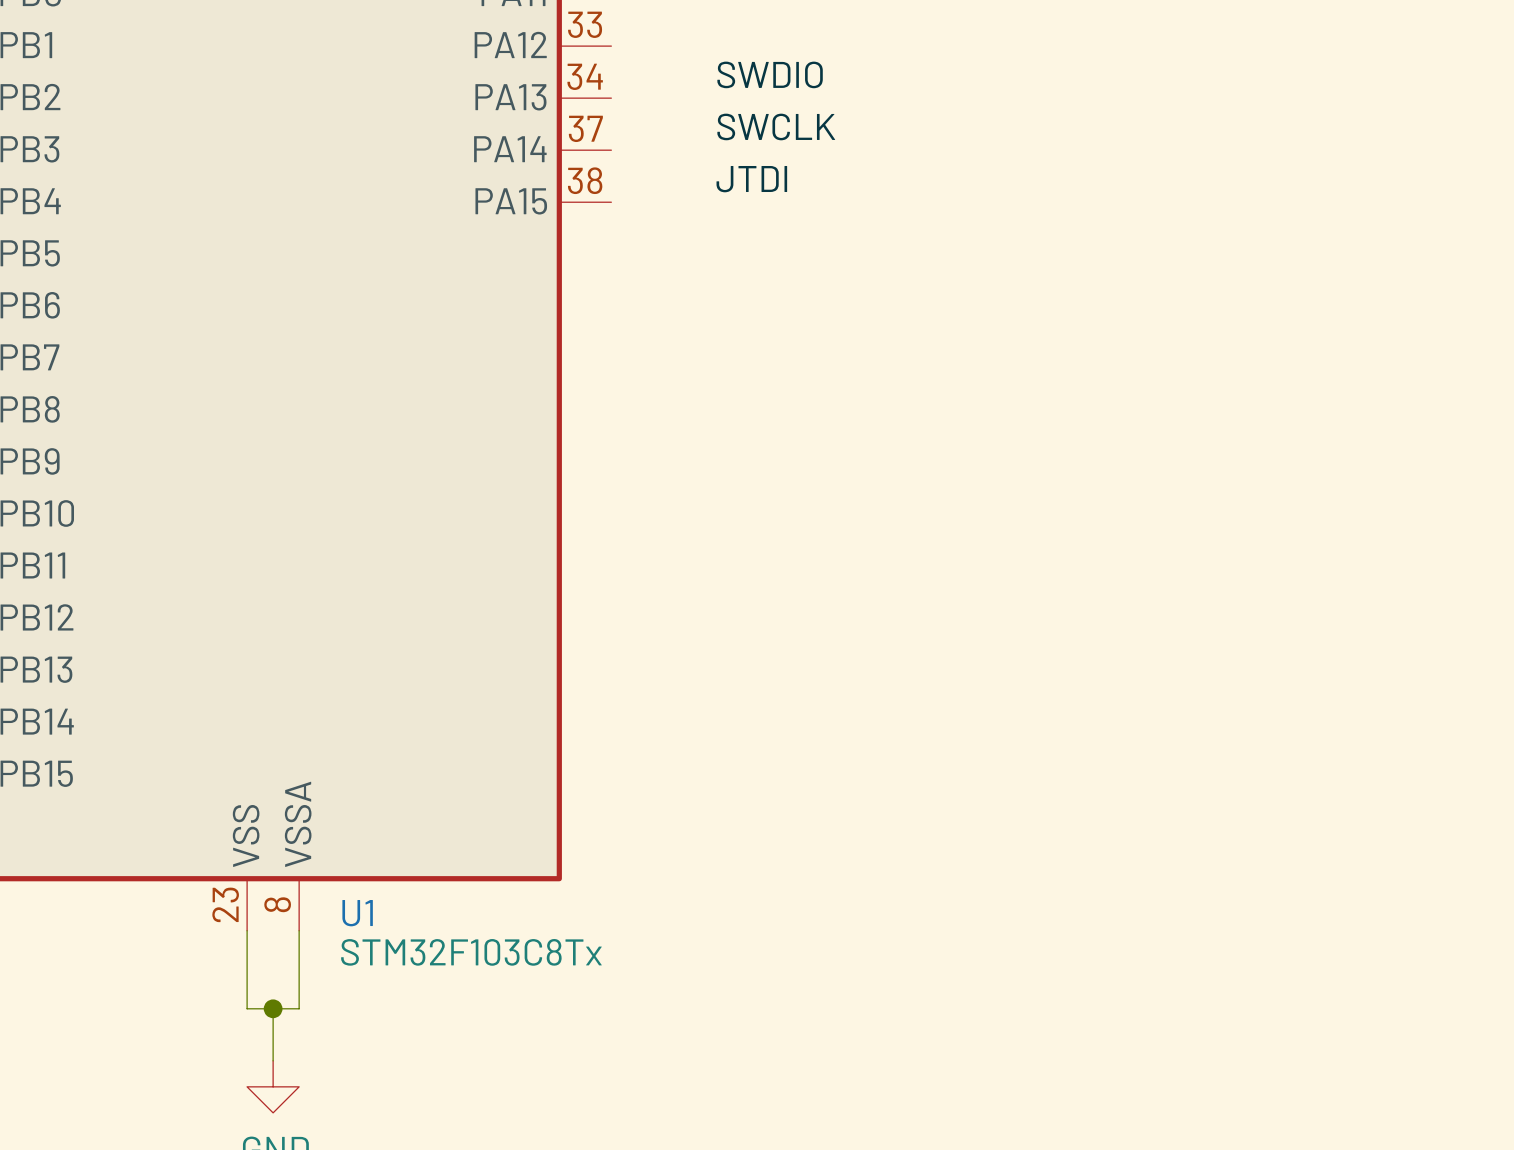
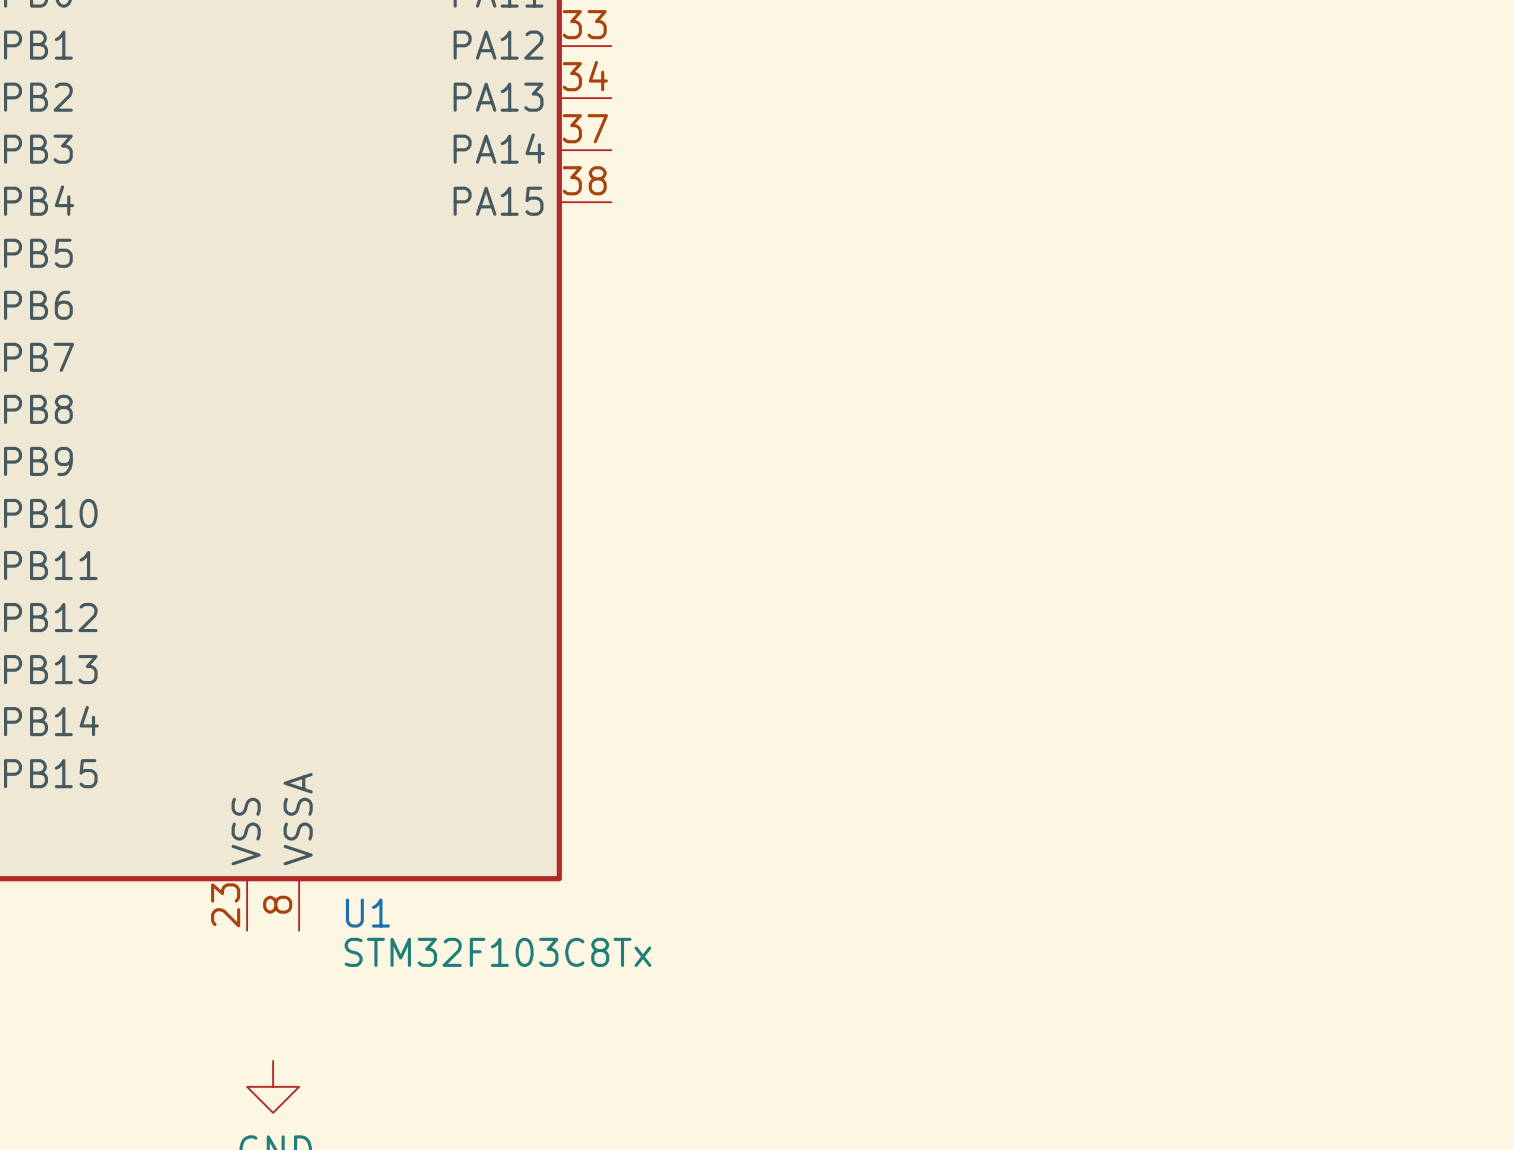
label: SWDIO (770, 74) -> none
label: SWCLK (776, 126) -> none
label: JTDI (751, 179) -> none
wire: (247, 930) (247, 1008) (299, 1008) (299, 930) -> none
wire: (273, 1008) (273, 1060) -> none
junction: (273, 1008) -> none

